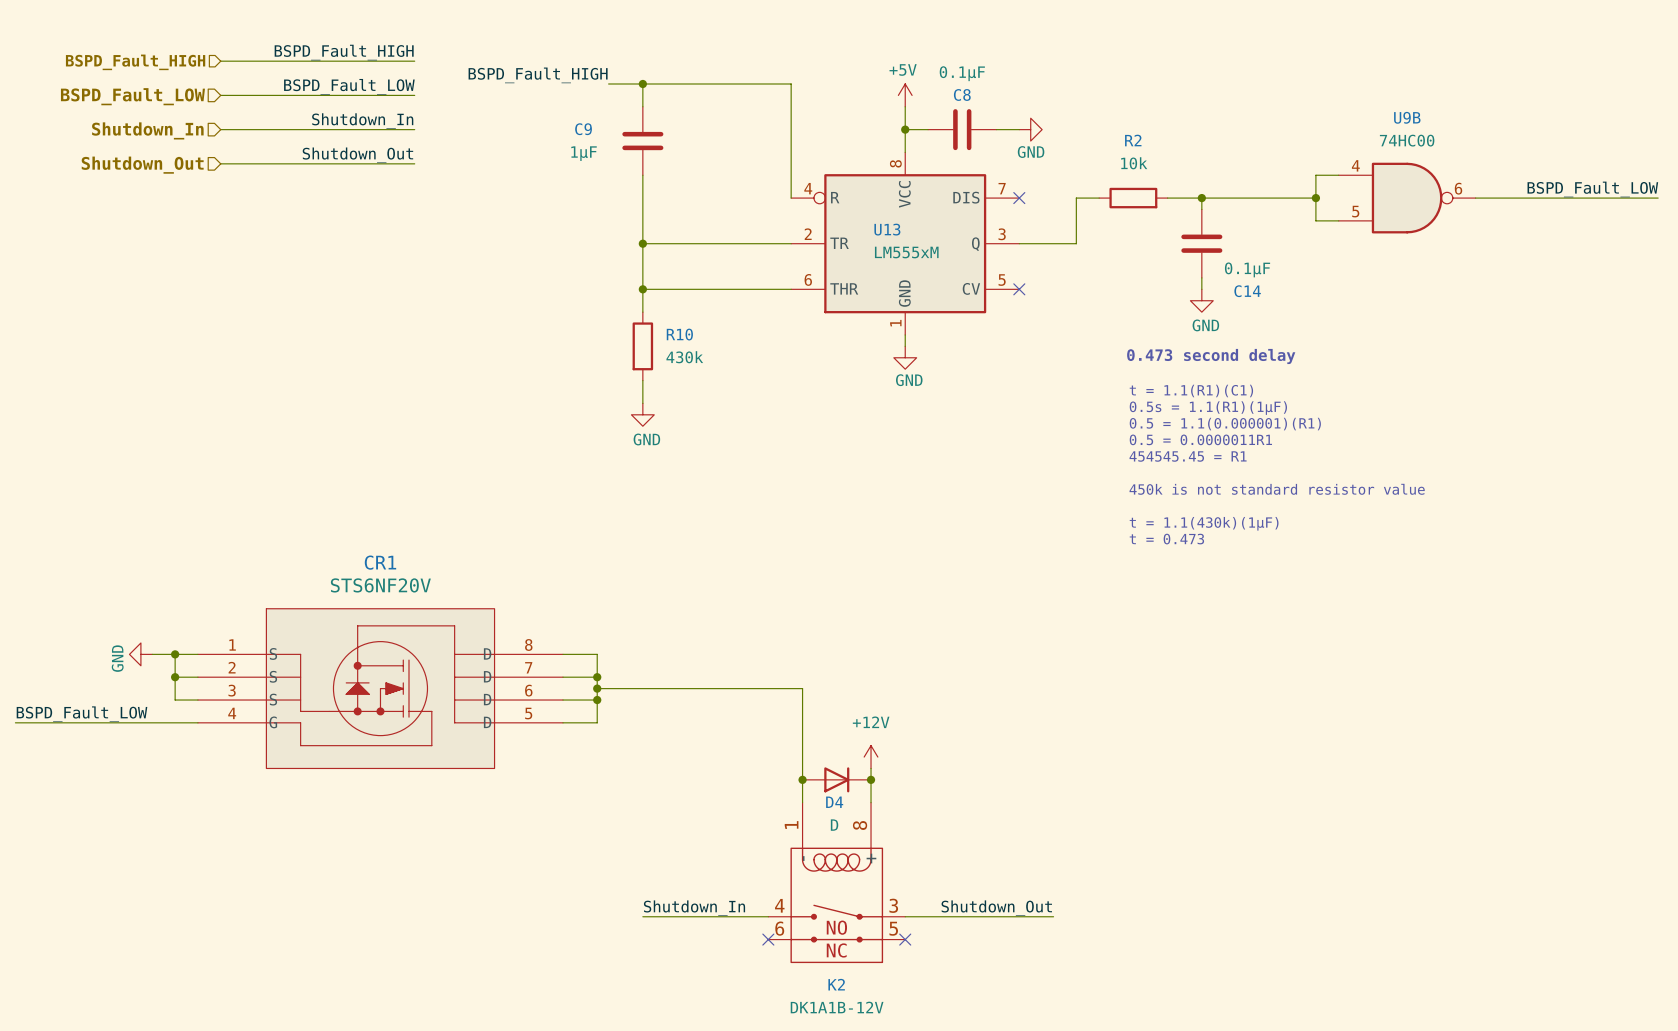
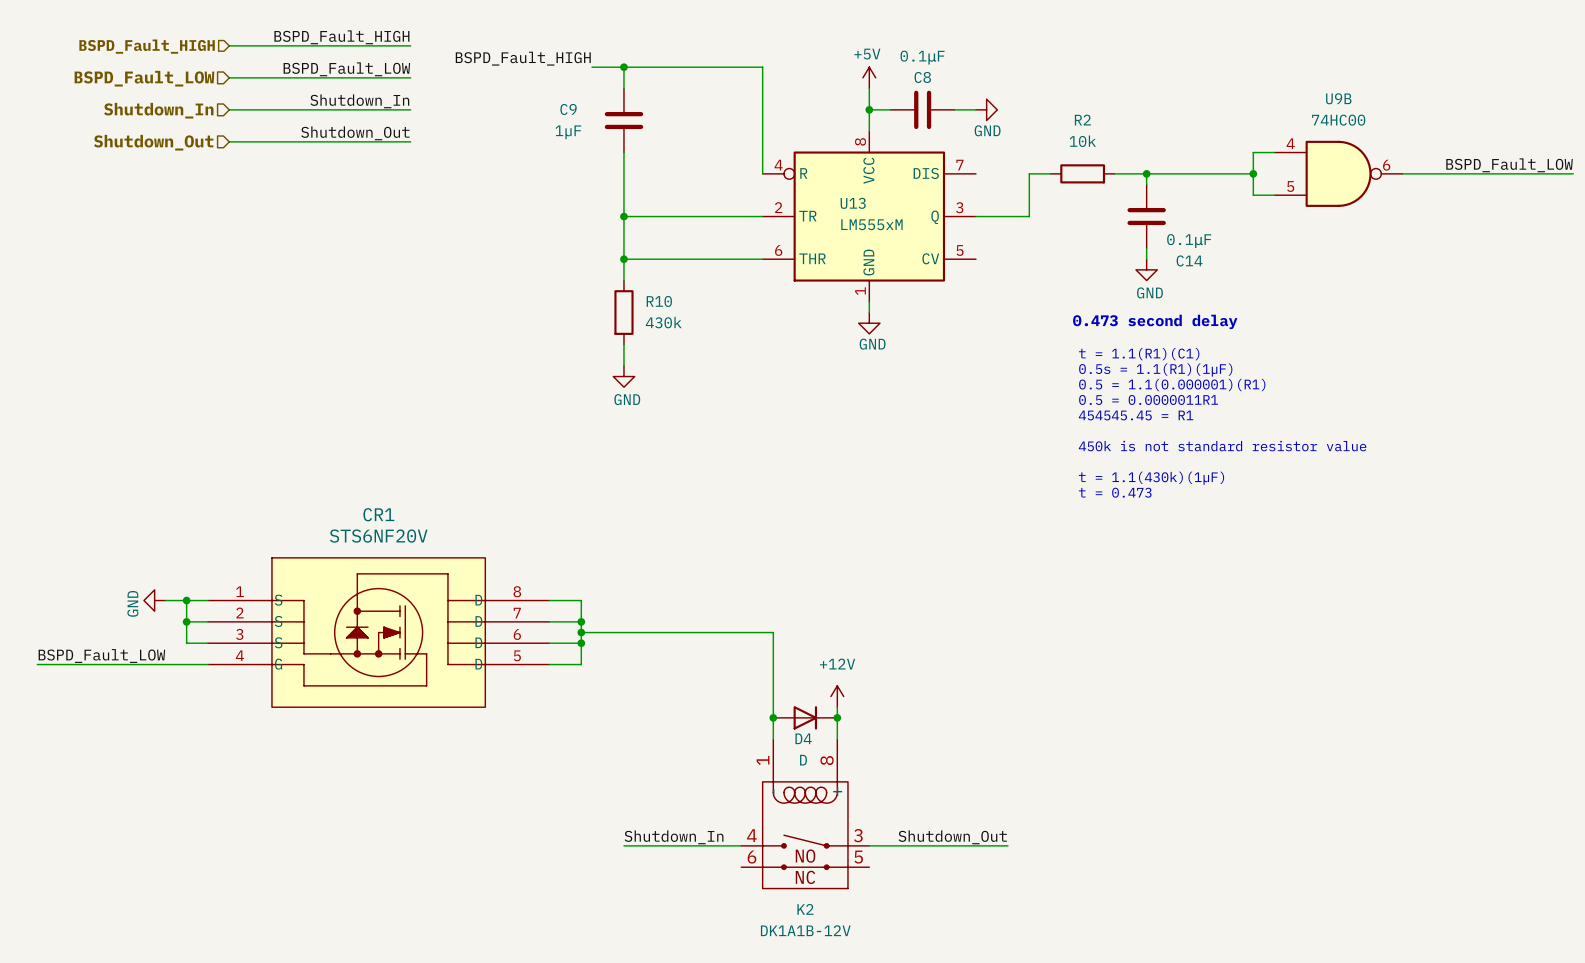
no-connect mark: (1019, 198) -> none
no-connect mark: (1019, 289) -> none
no-connect mark: (768, 939) -> none
no-connect mark: (905, 939) -> none

